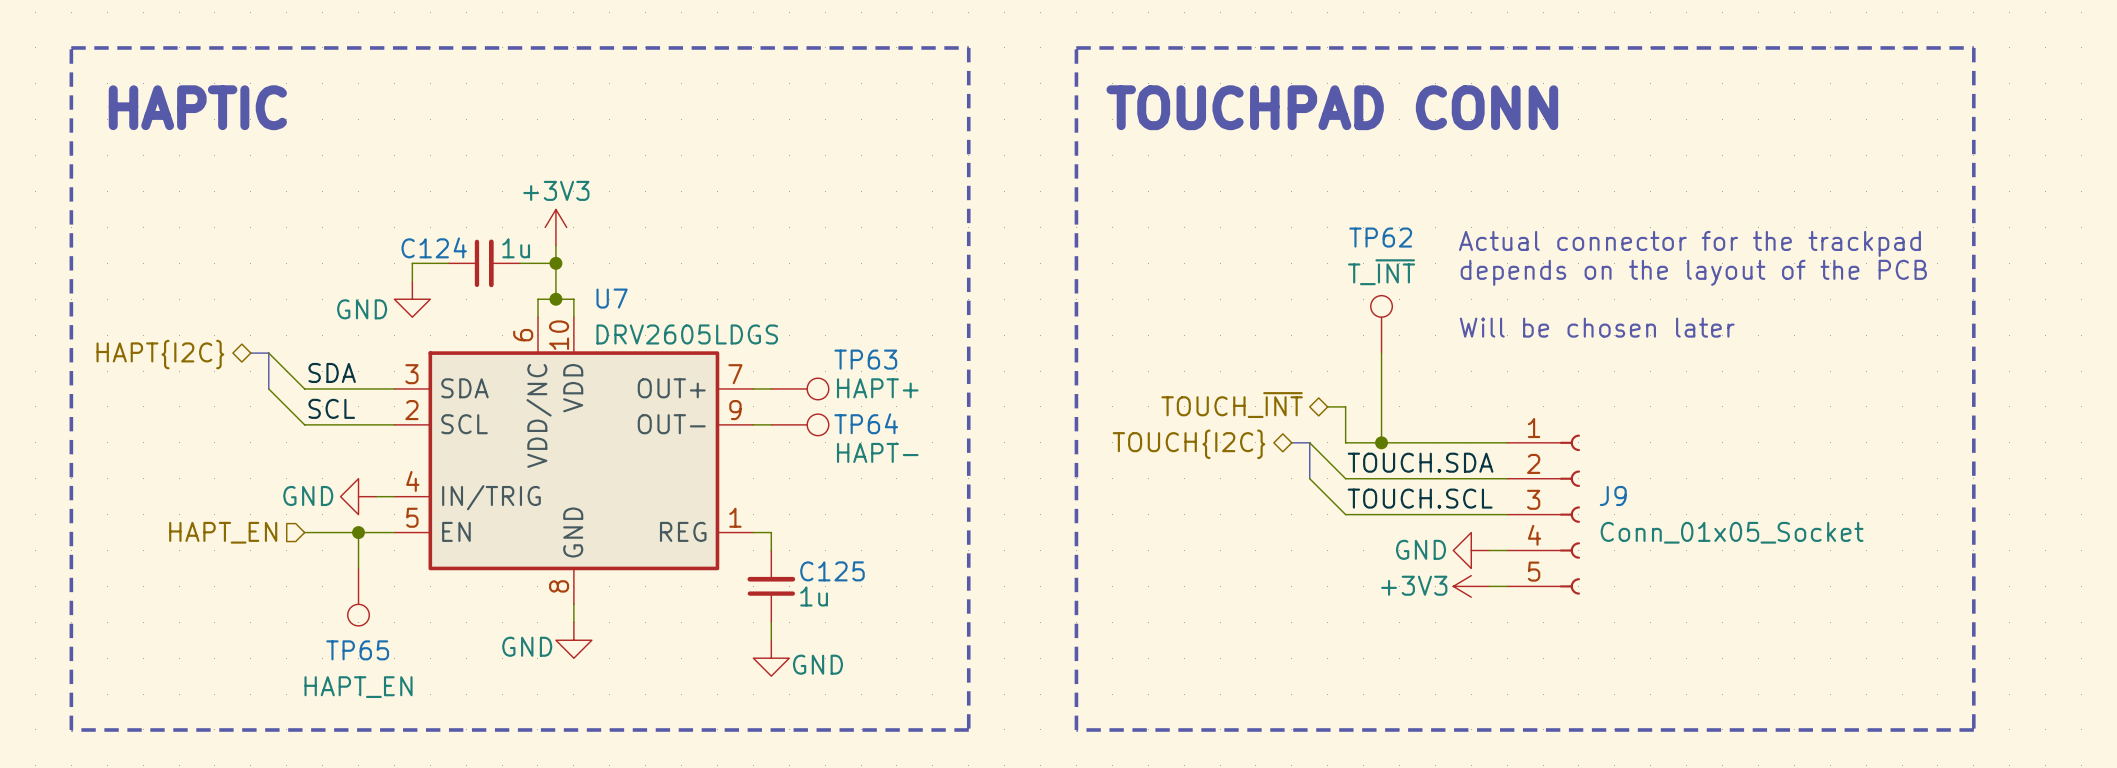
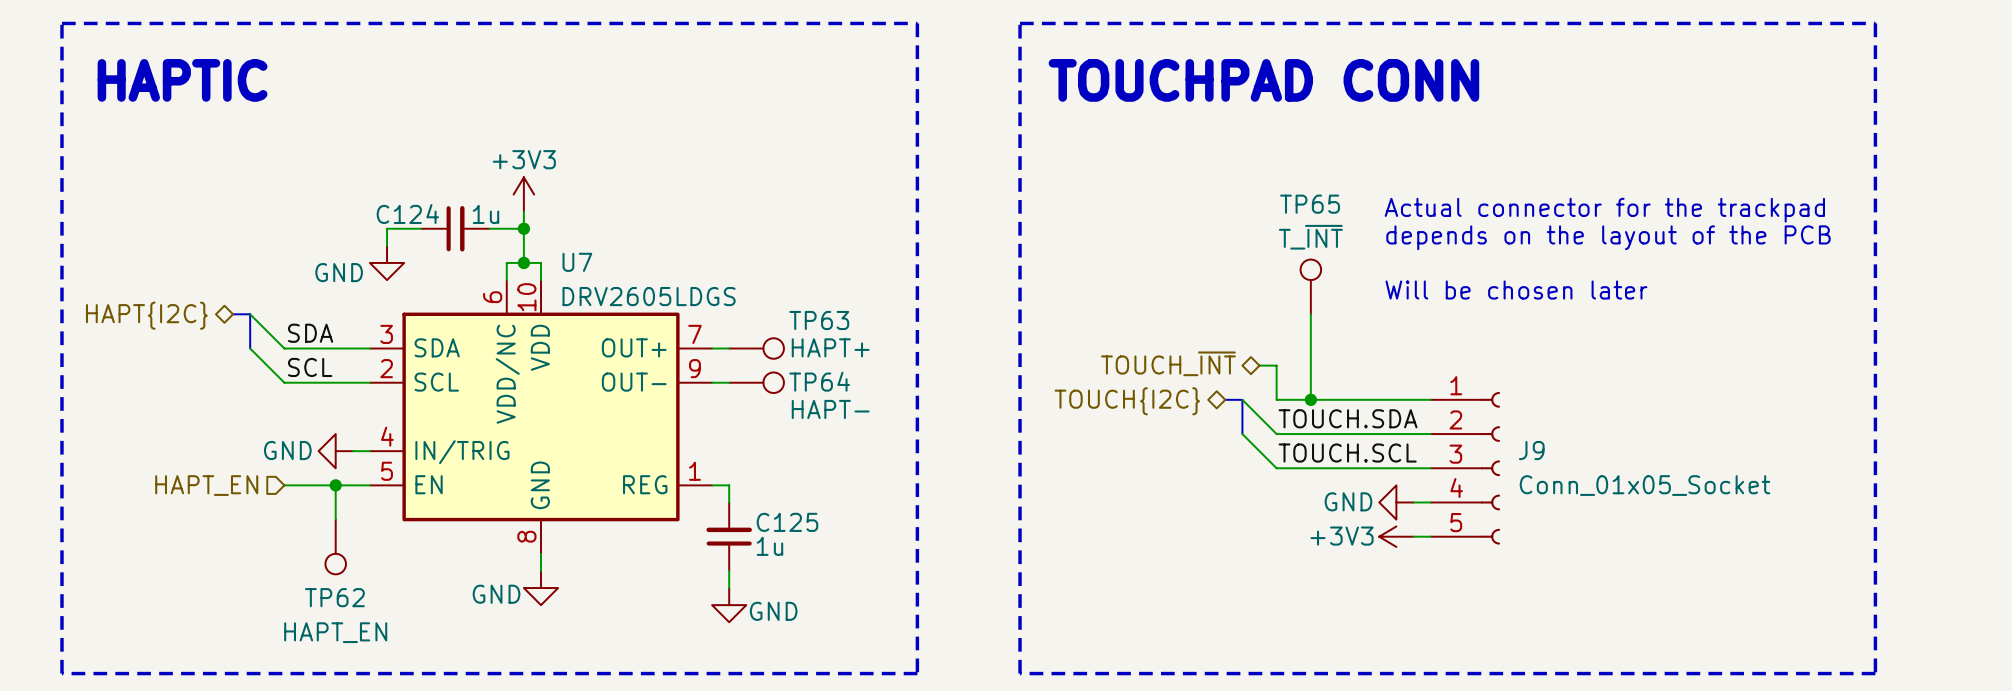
TP62 name: TP62 (1380, 237) -> TP65 (1310, 204)
TP65 name: TP65 (357, 650) -> TP62 (334, 597)

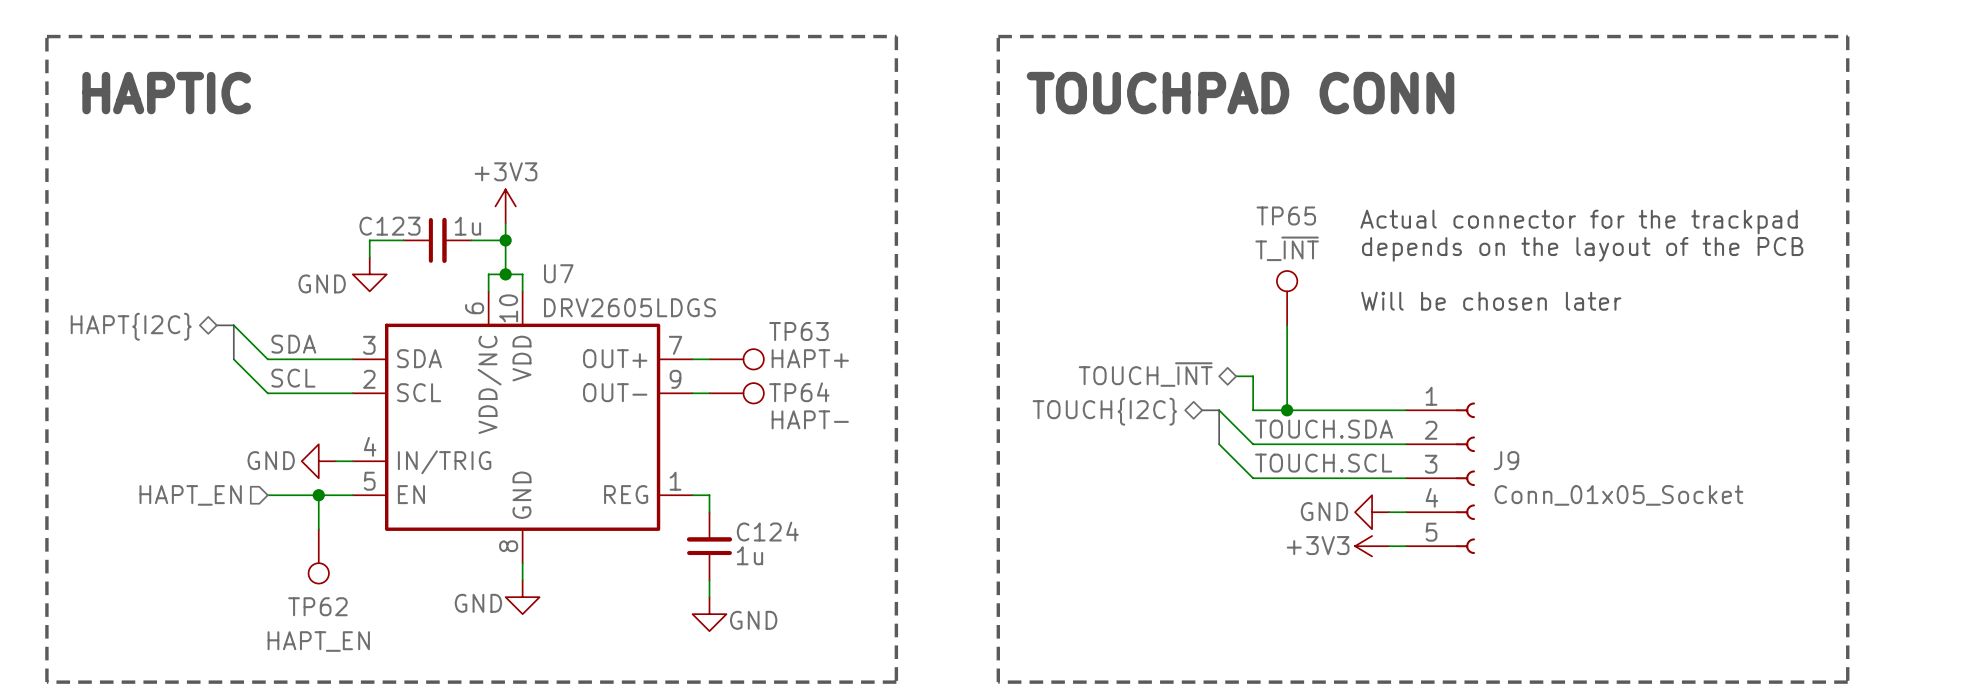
C124 name: C124 (407, 214) -> C123 (389, 226)
C125 name: C125 (787, 522) -> C124 (767, 531)

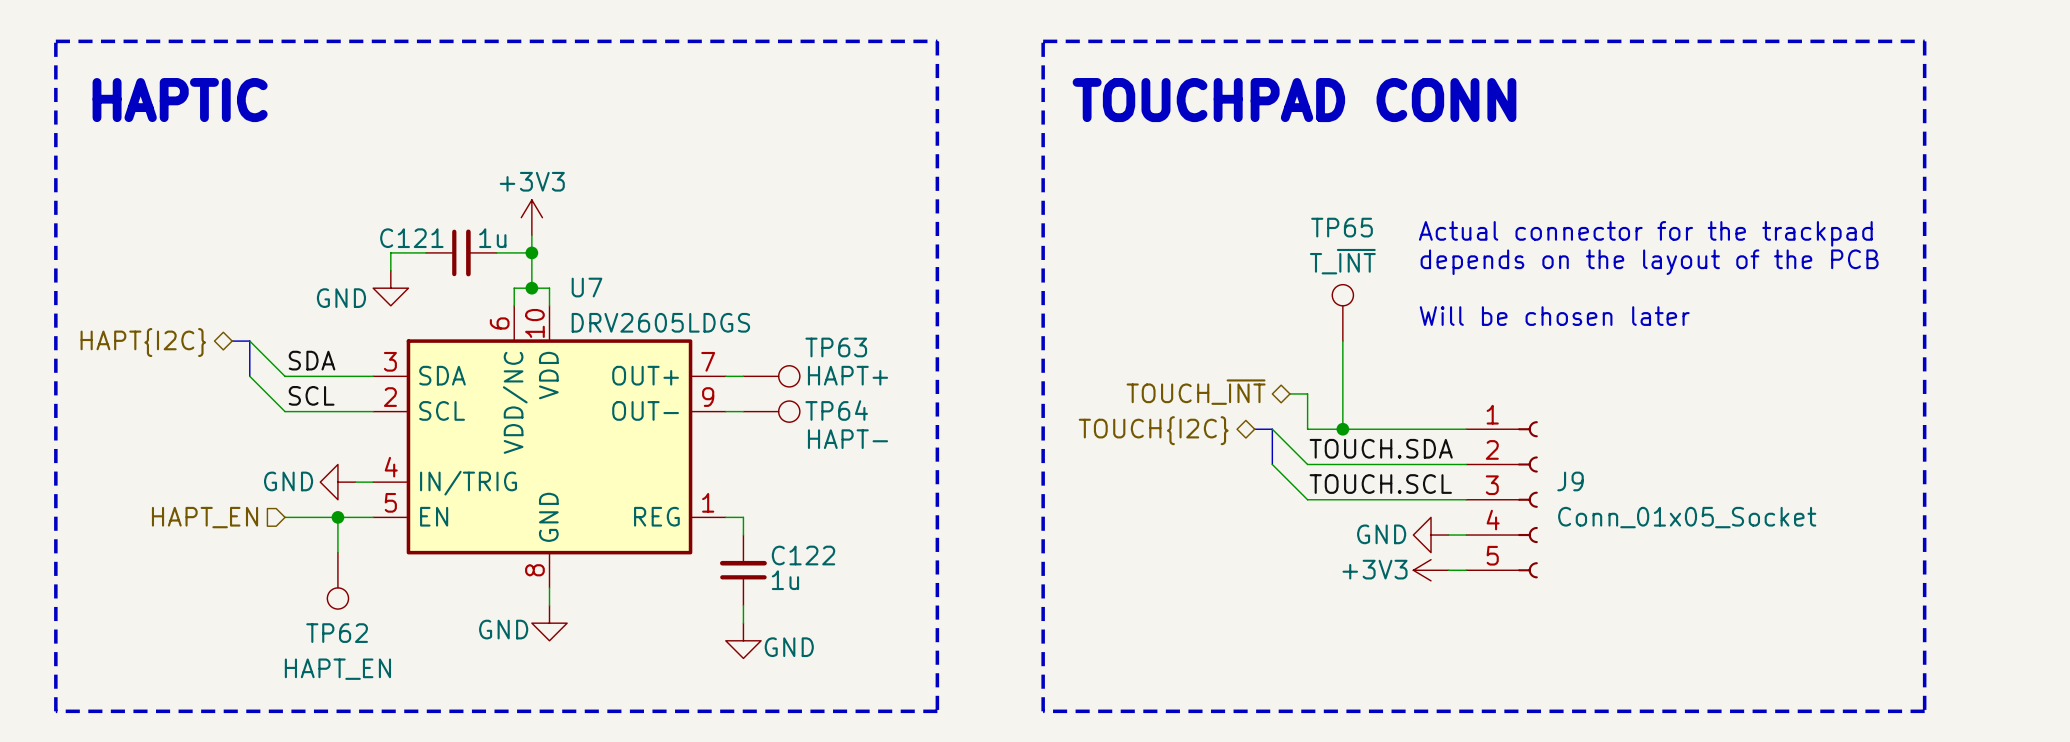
C123 name: C123 (389, 226) -> C121 (411, 238)
C124 name: C124 (767, 531) -> C122 (803, 555)

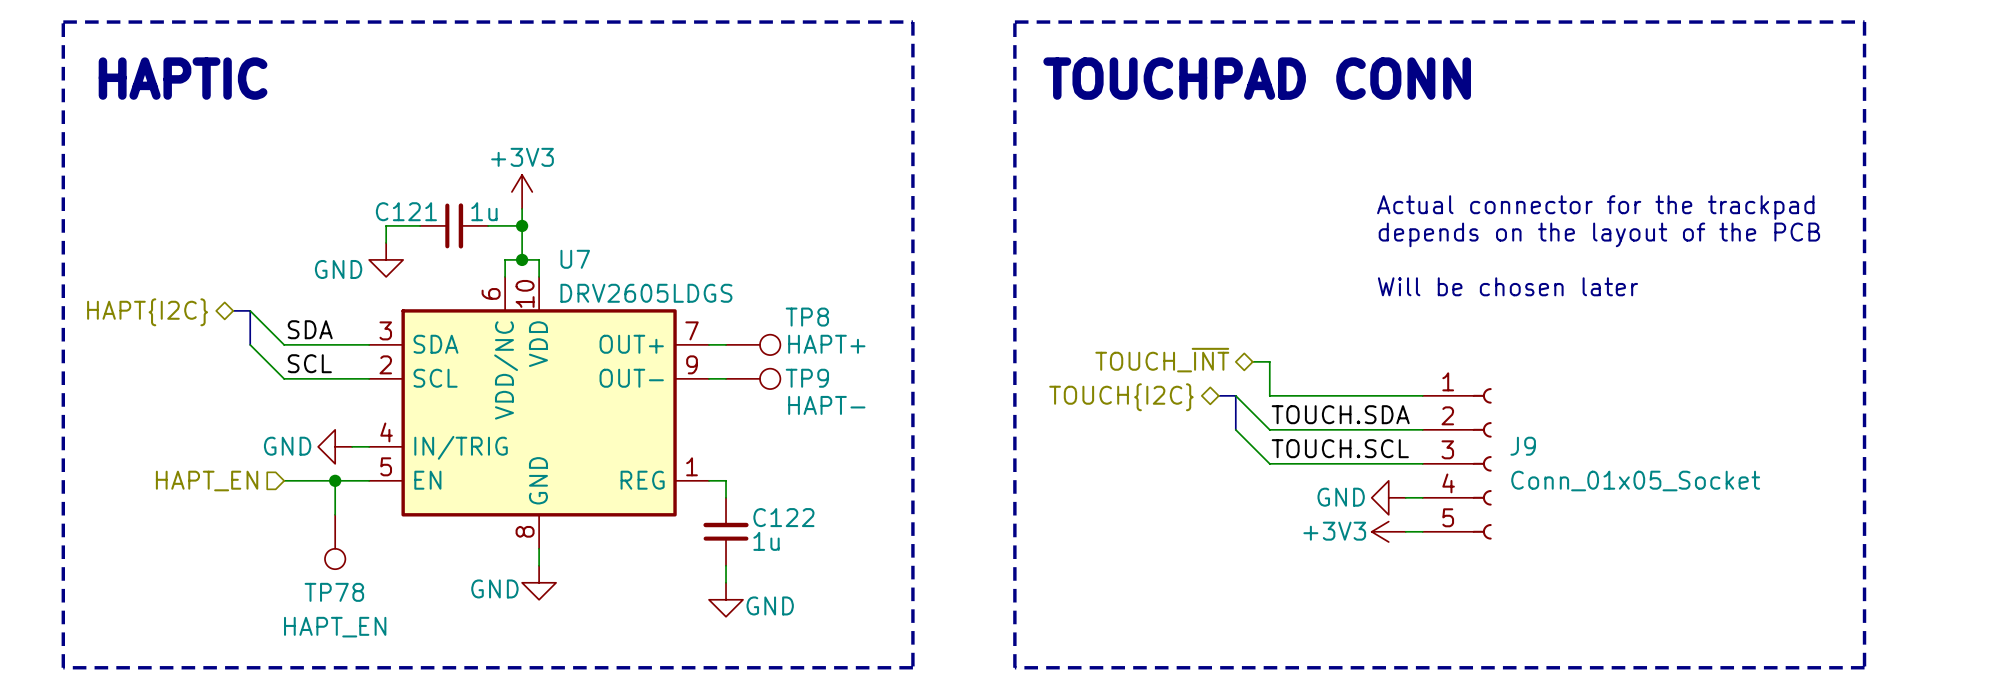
TP65: T_~{INT} (1342, 312) -> none
wire: (1342, 341) (1342, 429) -> none
TP63 name: TP63 (836, 347) -> TP8 (807, 317)
TP64 name: TP64 (836, 410) -> TP9 (807, 378)
junction: (1342, 429) -> none
TP62 name: TP62 (337, 633) -> TP78 (334, 592)

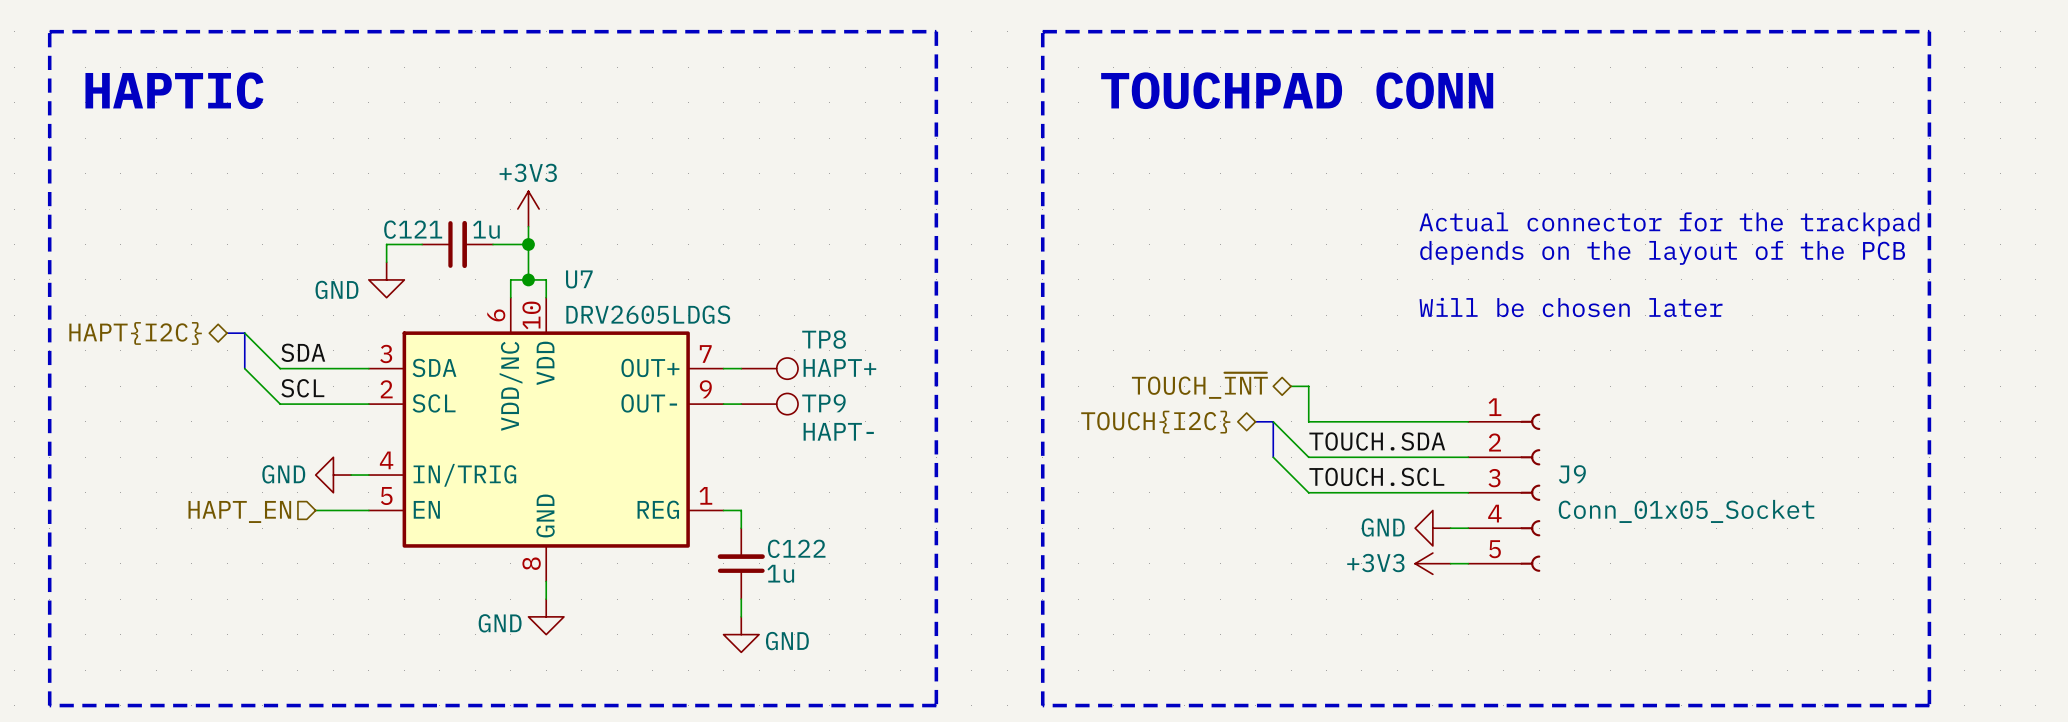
wire: (284, 480) (318, 480) -> none
wire: (335, 480) (335, 514) -> none
junction: (335, 480) -> none
hierarchical label position: HAPT_EN (207, 481) -> HAPT_EN (239, 511)
TP78: HAPT_EN (335, 542) -> none

